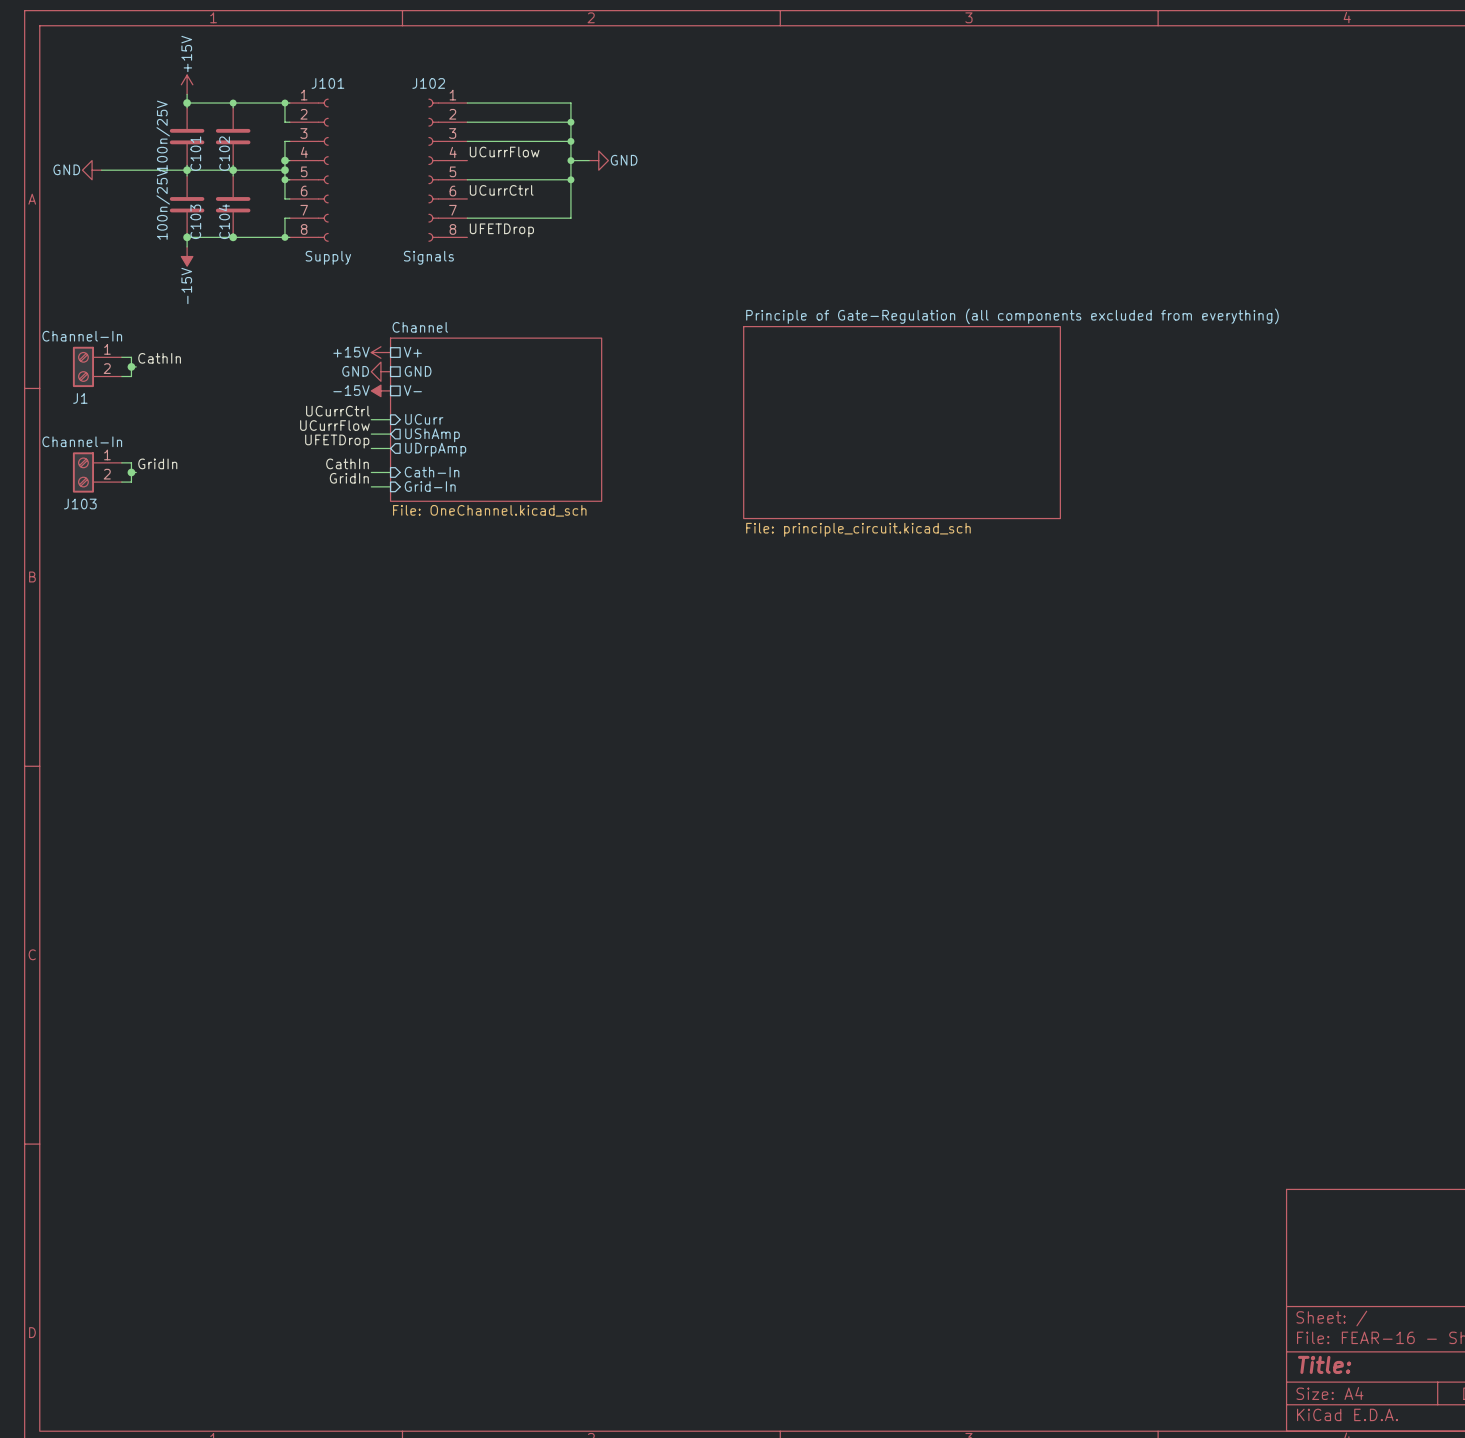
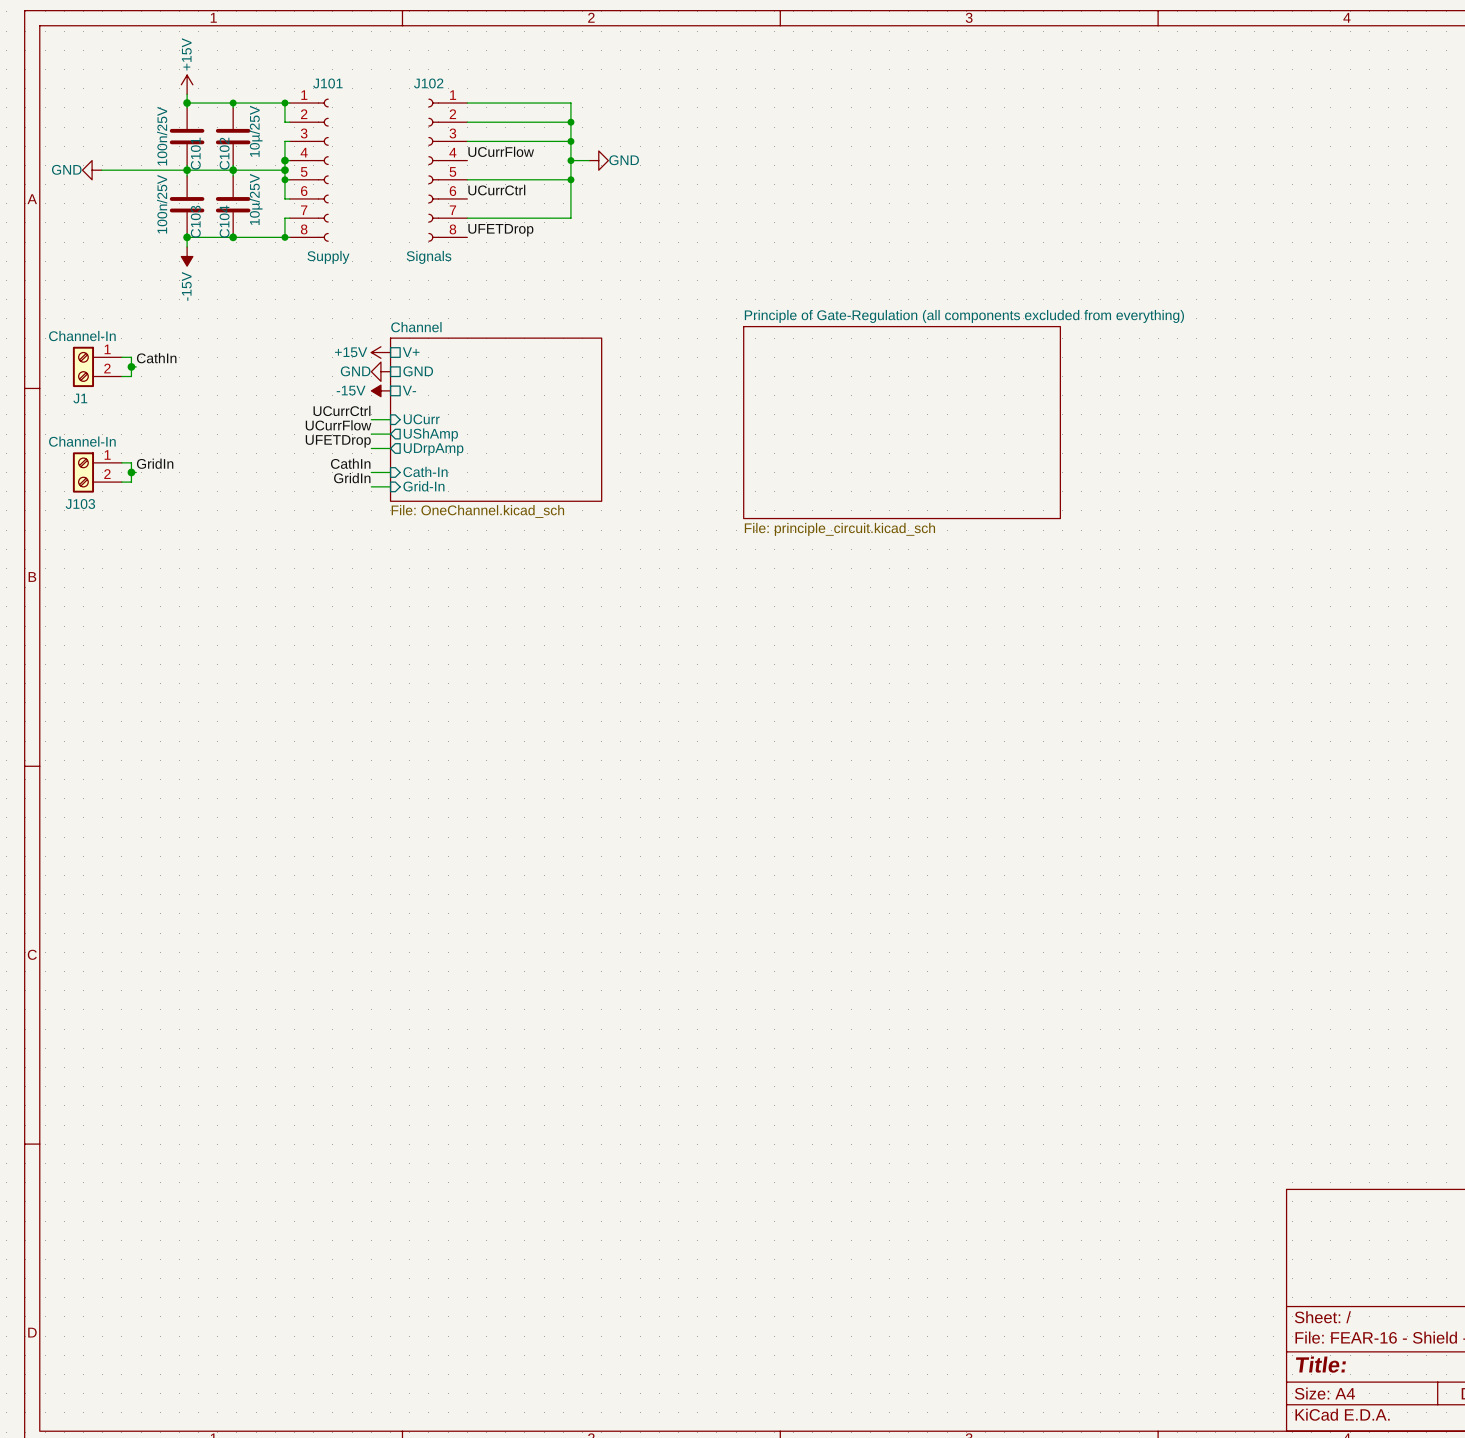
C102 value: none -> 10µ/25V (256, 131)
C104 value: none -> 10µ/25V (256, 199)

